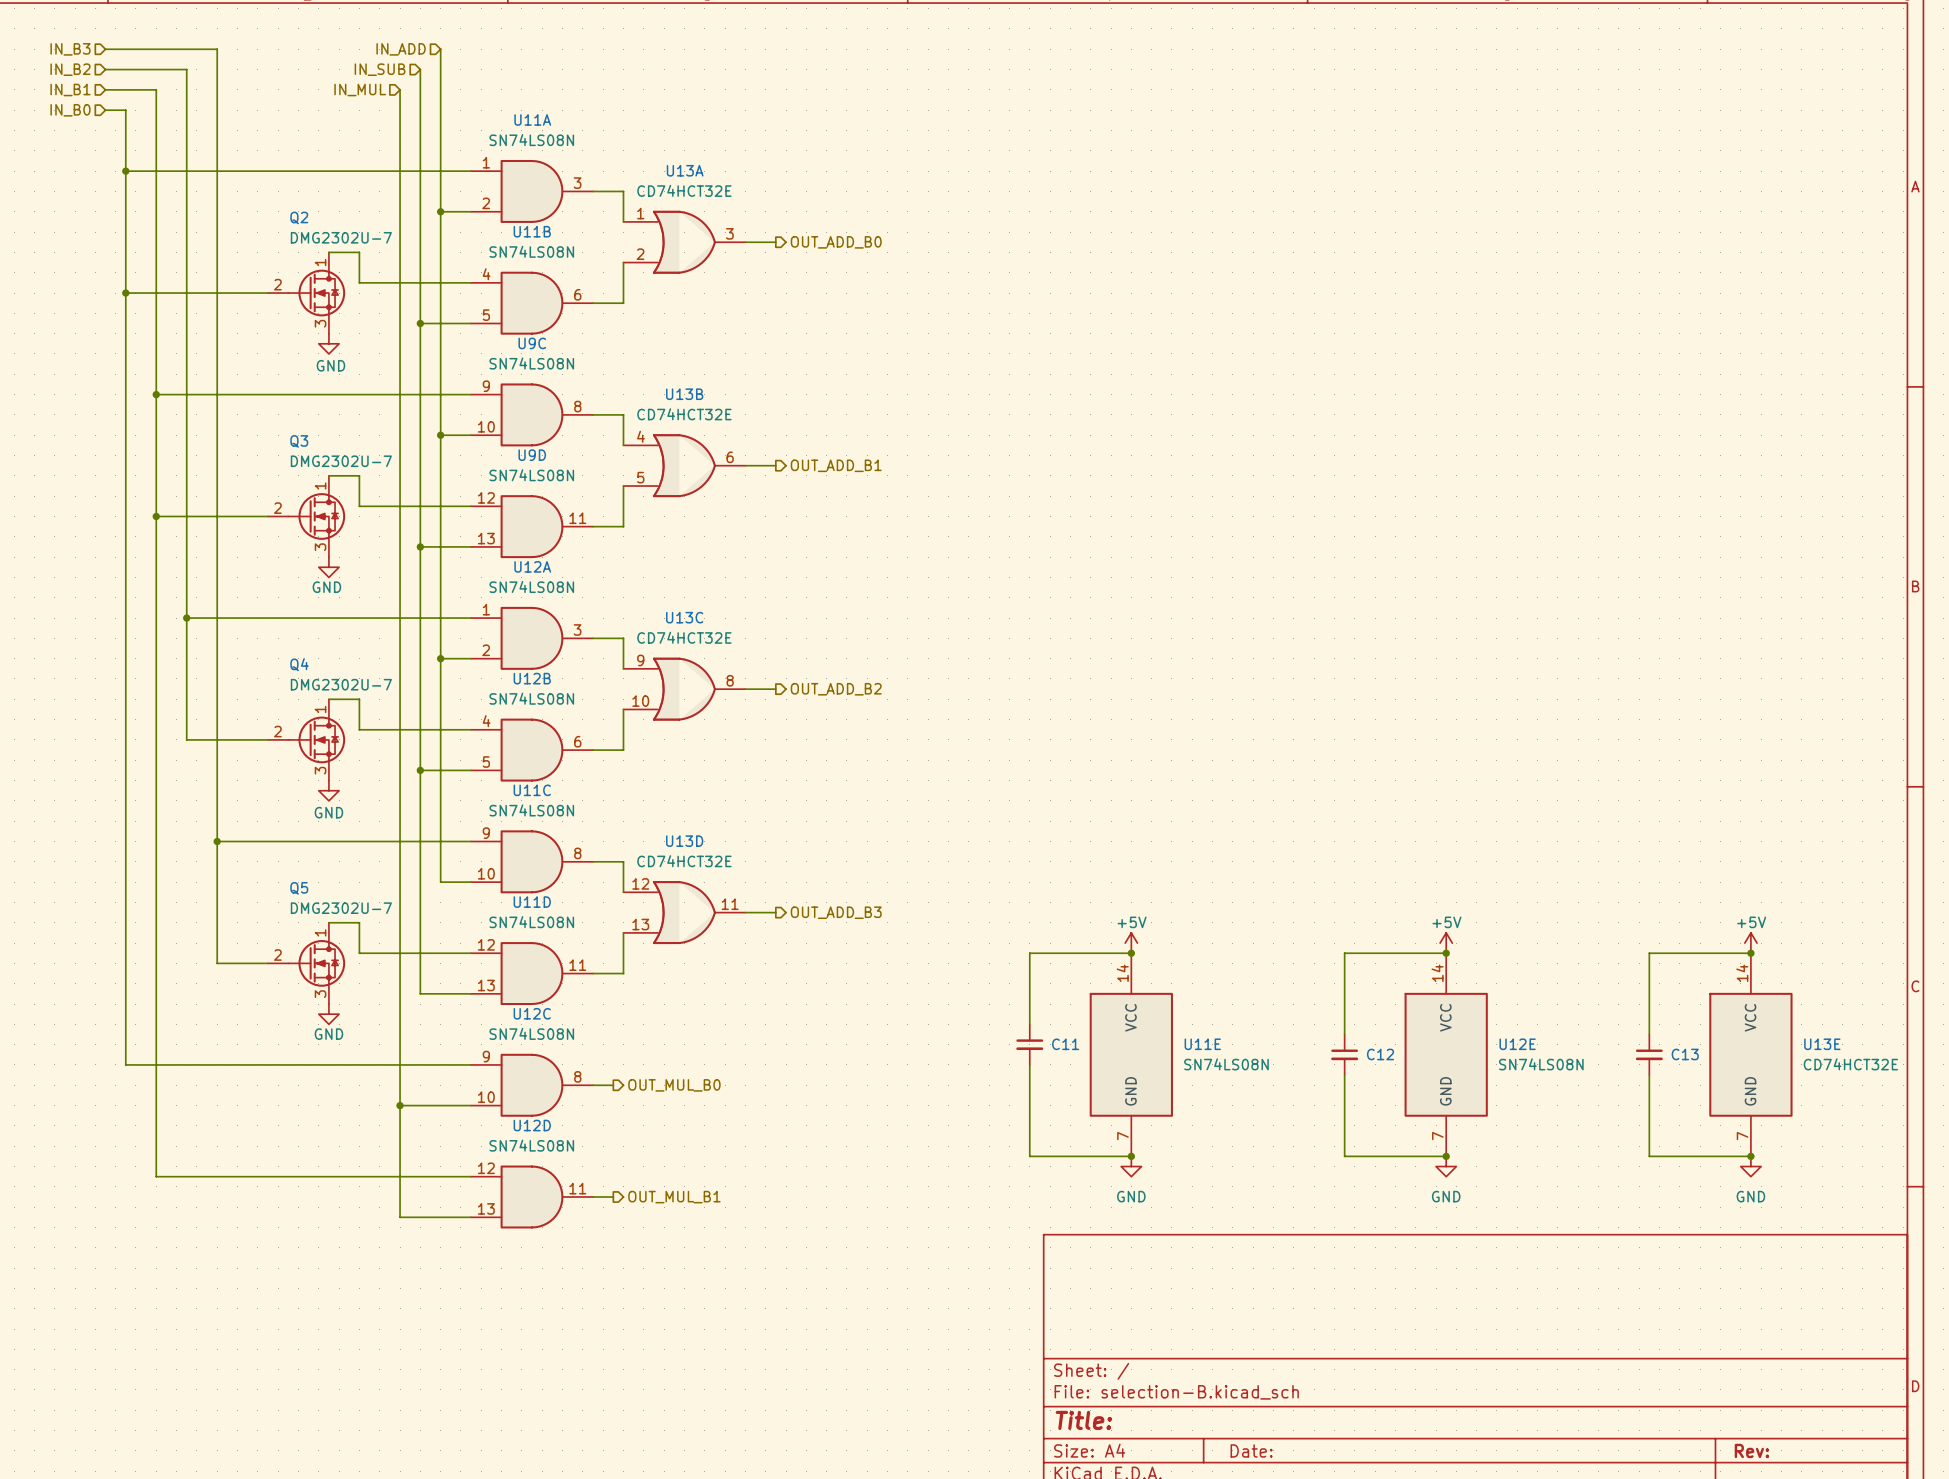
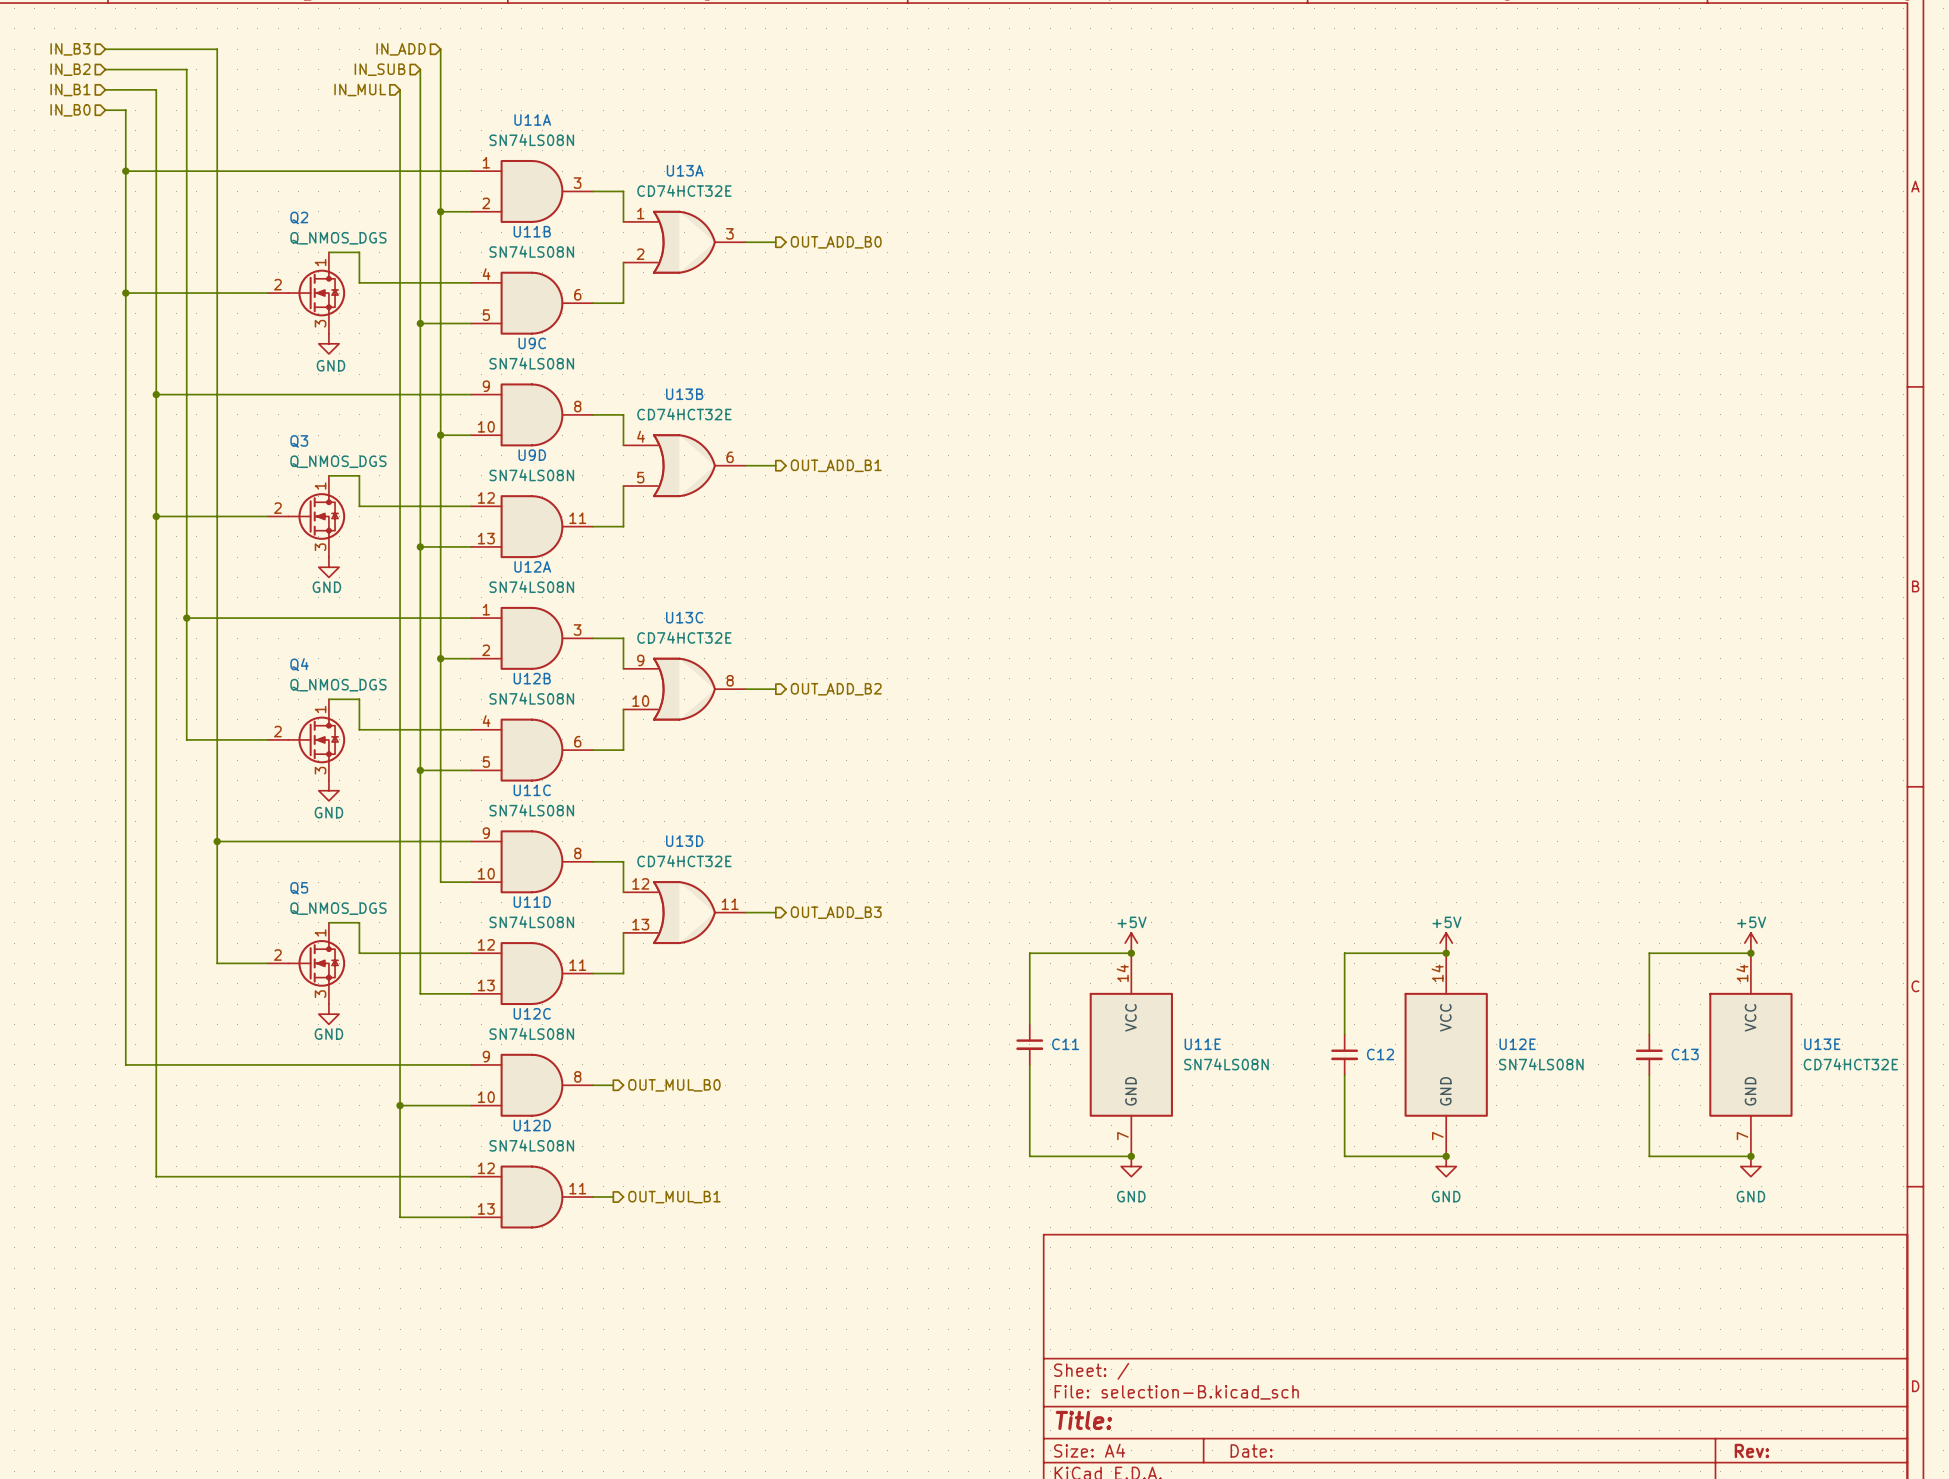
Q2 value: DMG2302U-7 (341, 237) -> Q_NMOS_DGS (338, 238)
Q3 value: DMG2302U-7 (341, 461) -> Q_NMOS_DGS (338, 461)
Q4 value: DMG2302U-7 (341, 684) -> Q_NMOS_DGS (338, 685)
Q5 value: DMG2302U-7 (341, 908) -> Q_NMOS_DGS (338, 908)

